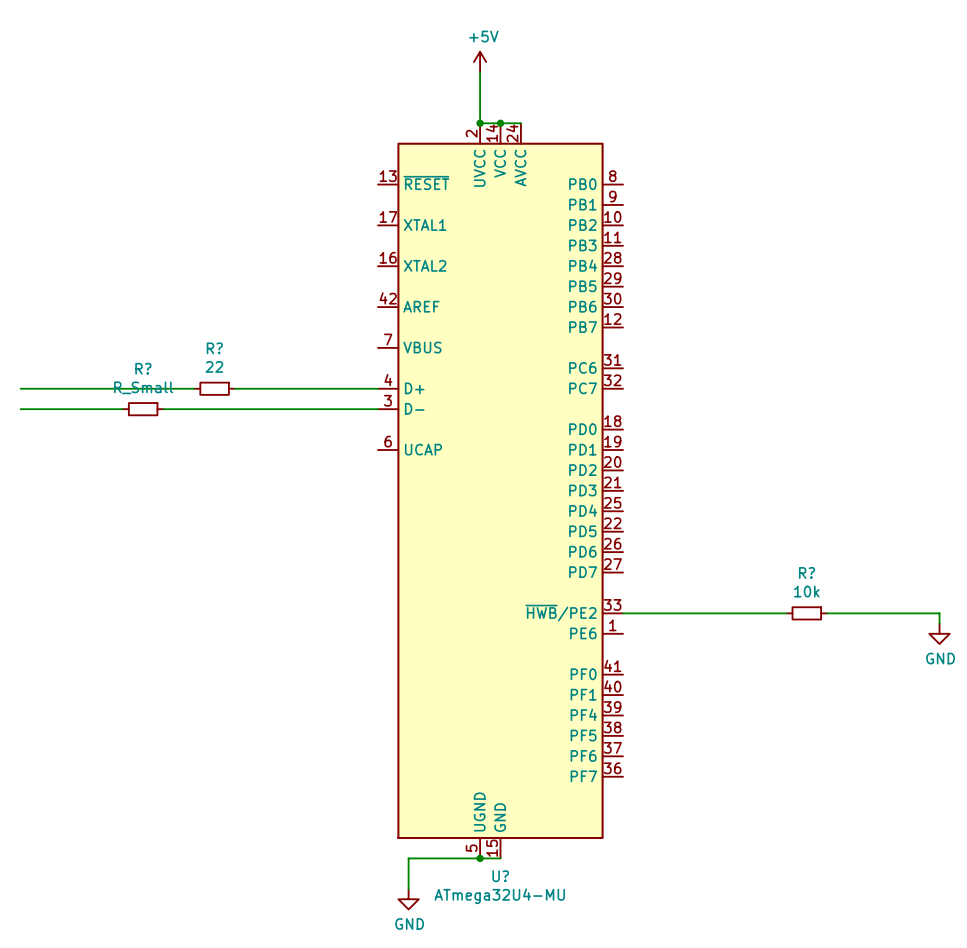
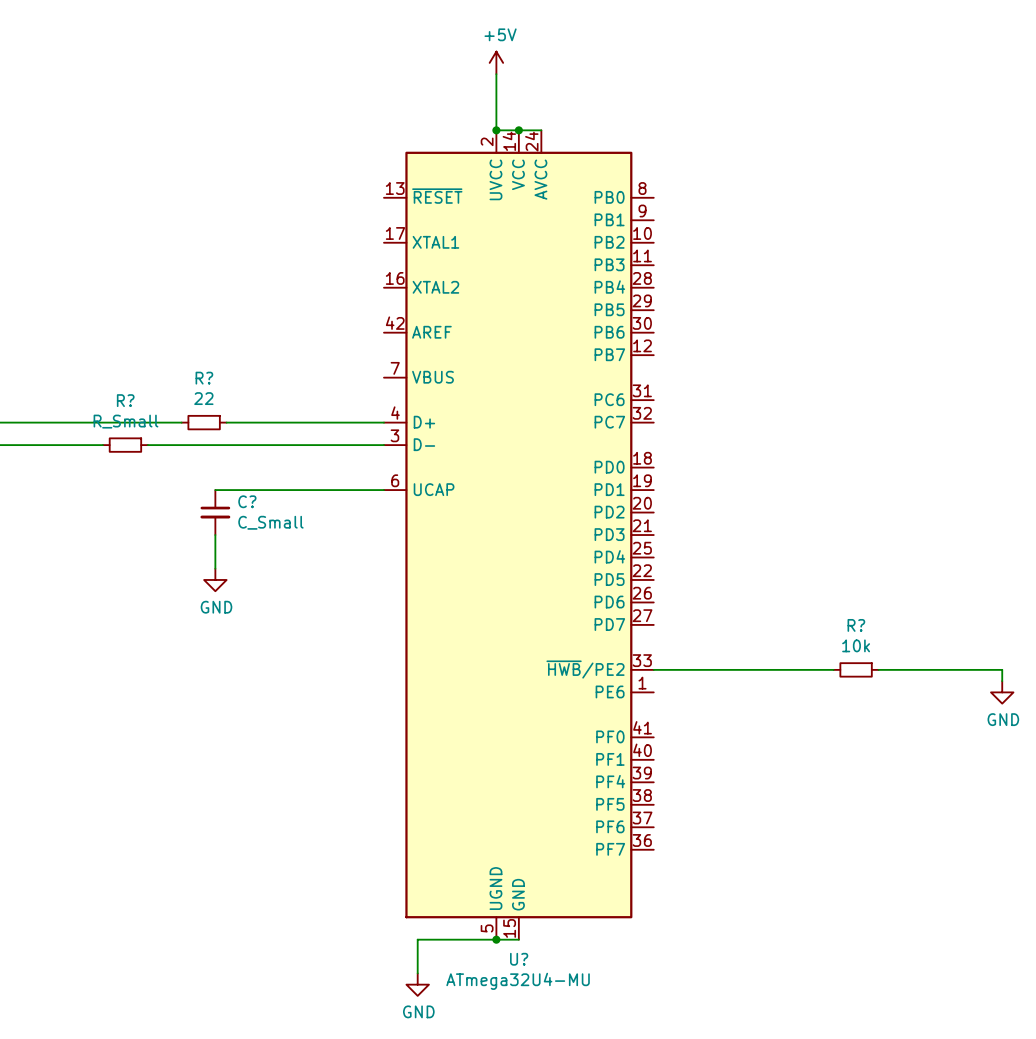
wire: none -> (215, 490) (383, 490)
C?: none -> C_Small (215, 512)
wire: none -> (215, 535) (215, 568)
power symbol: none -> GND (215, 579)

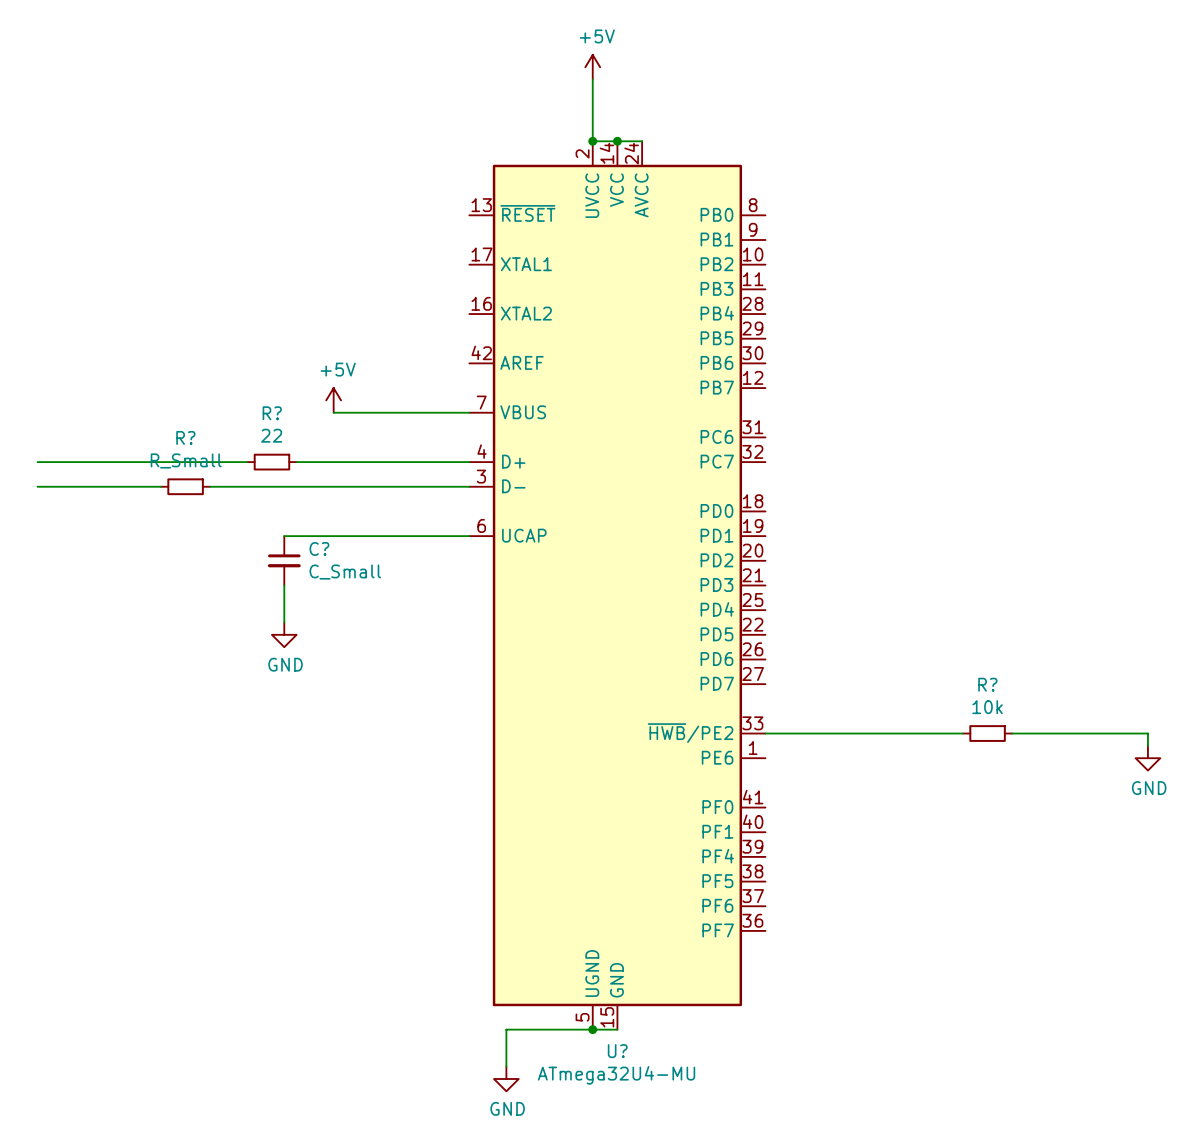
power symbol: none -> +5V (333, 400)
wire: none -> (333, 412) (469, 412)

